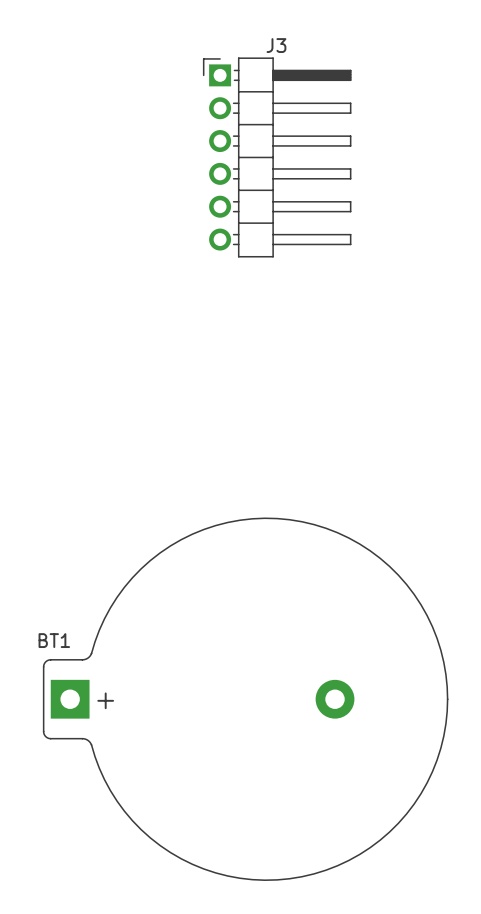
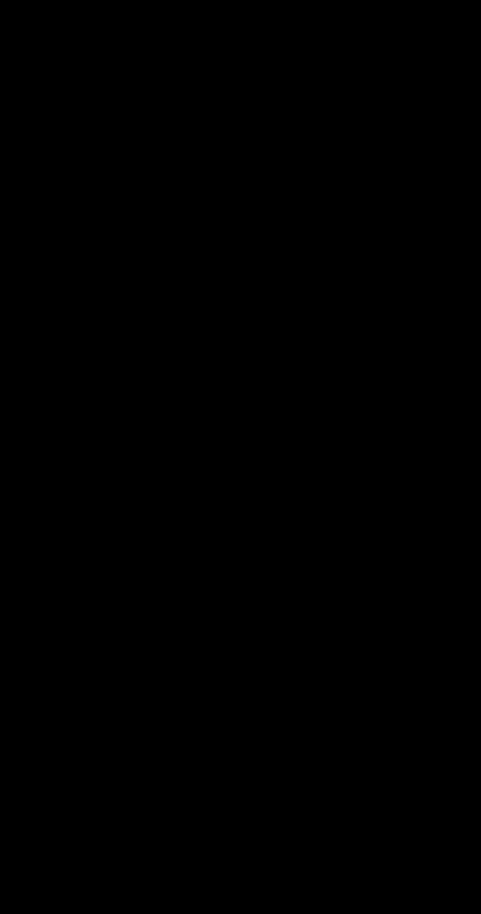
J3: (277, 157) -> none
BT1: (245, 699) -> none

